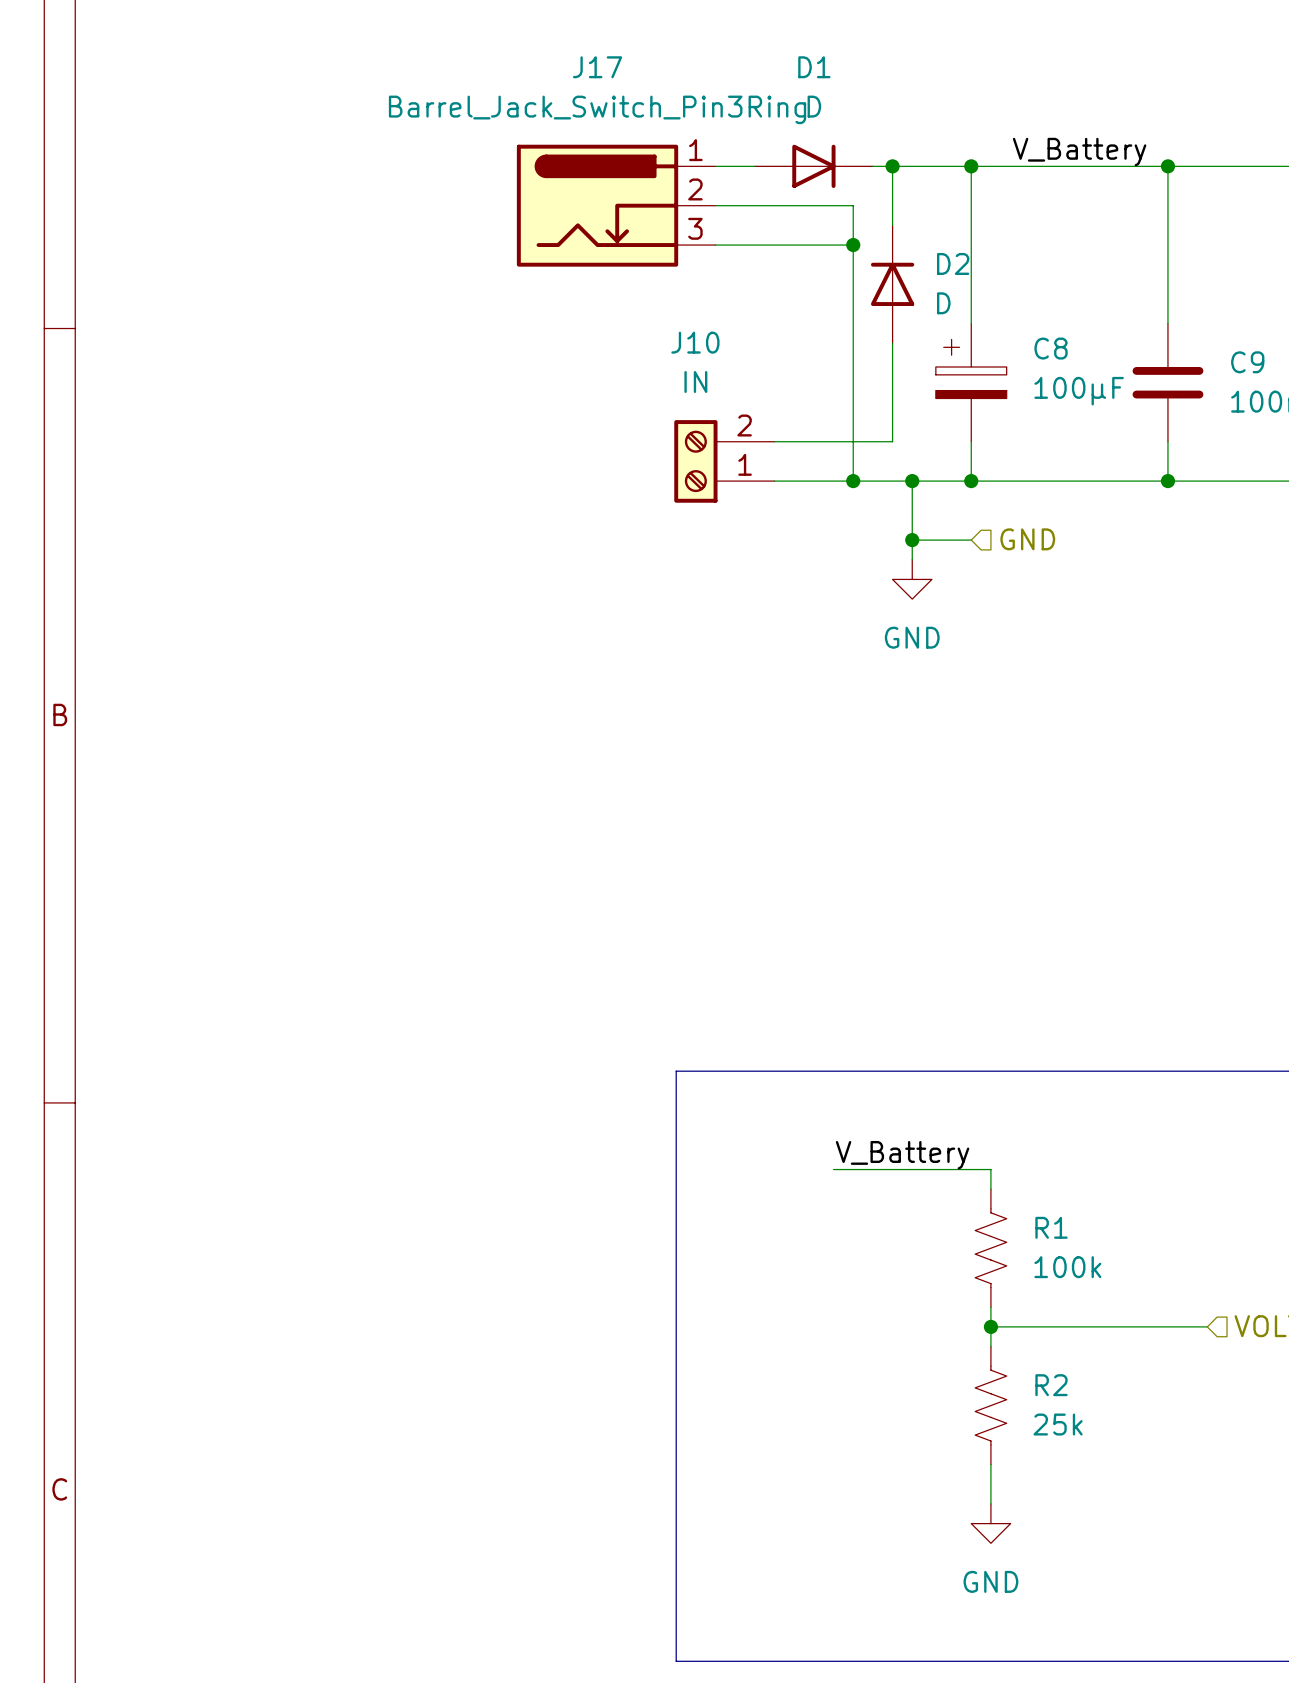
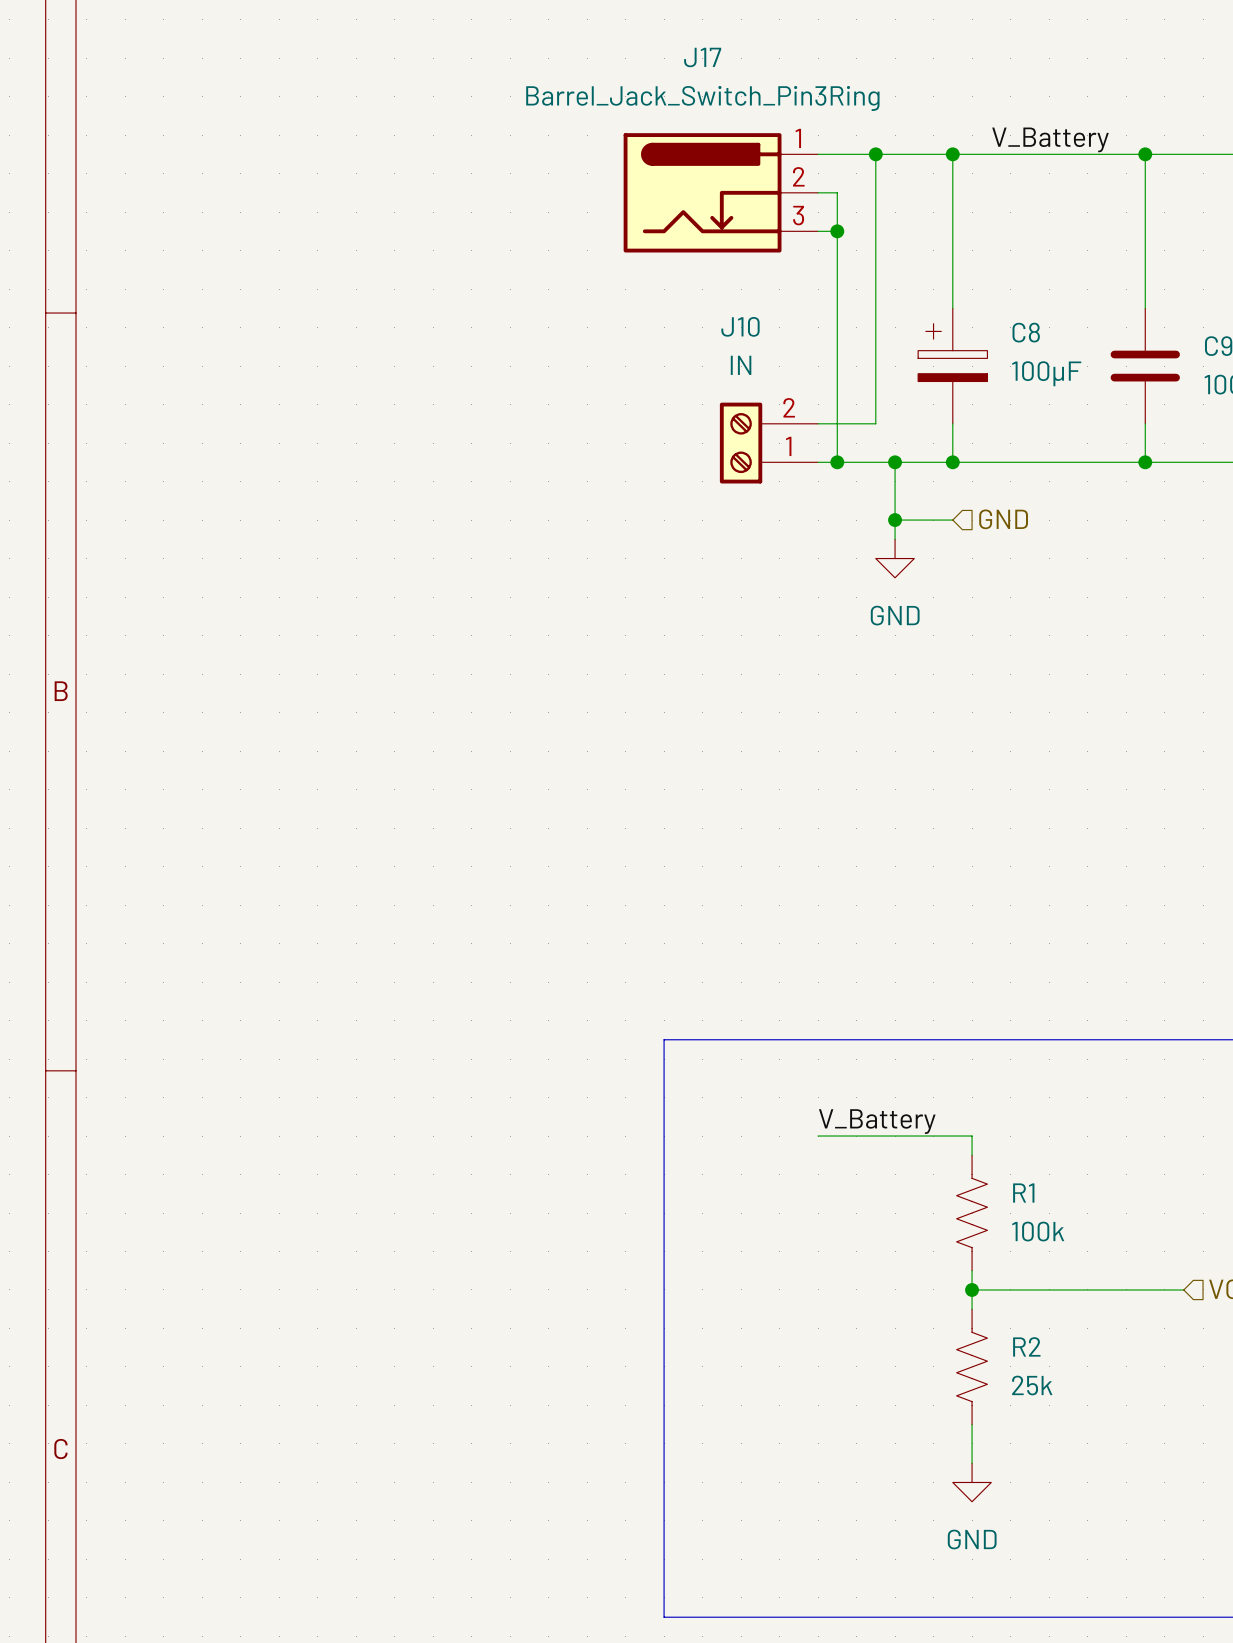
D1: D (813, 166) -> none
J17 position: (616, 205) -> (720, 192)
D2: D (892, 284) -> none
J10 position: (724, 461) -> (768, 443)

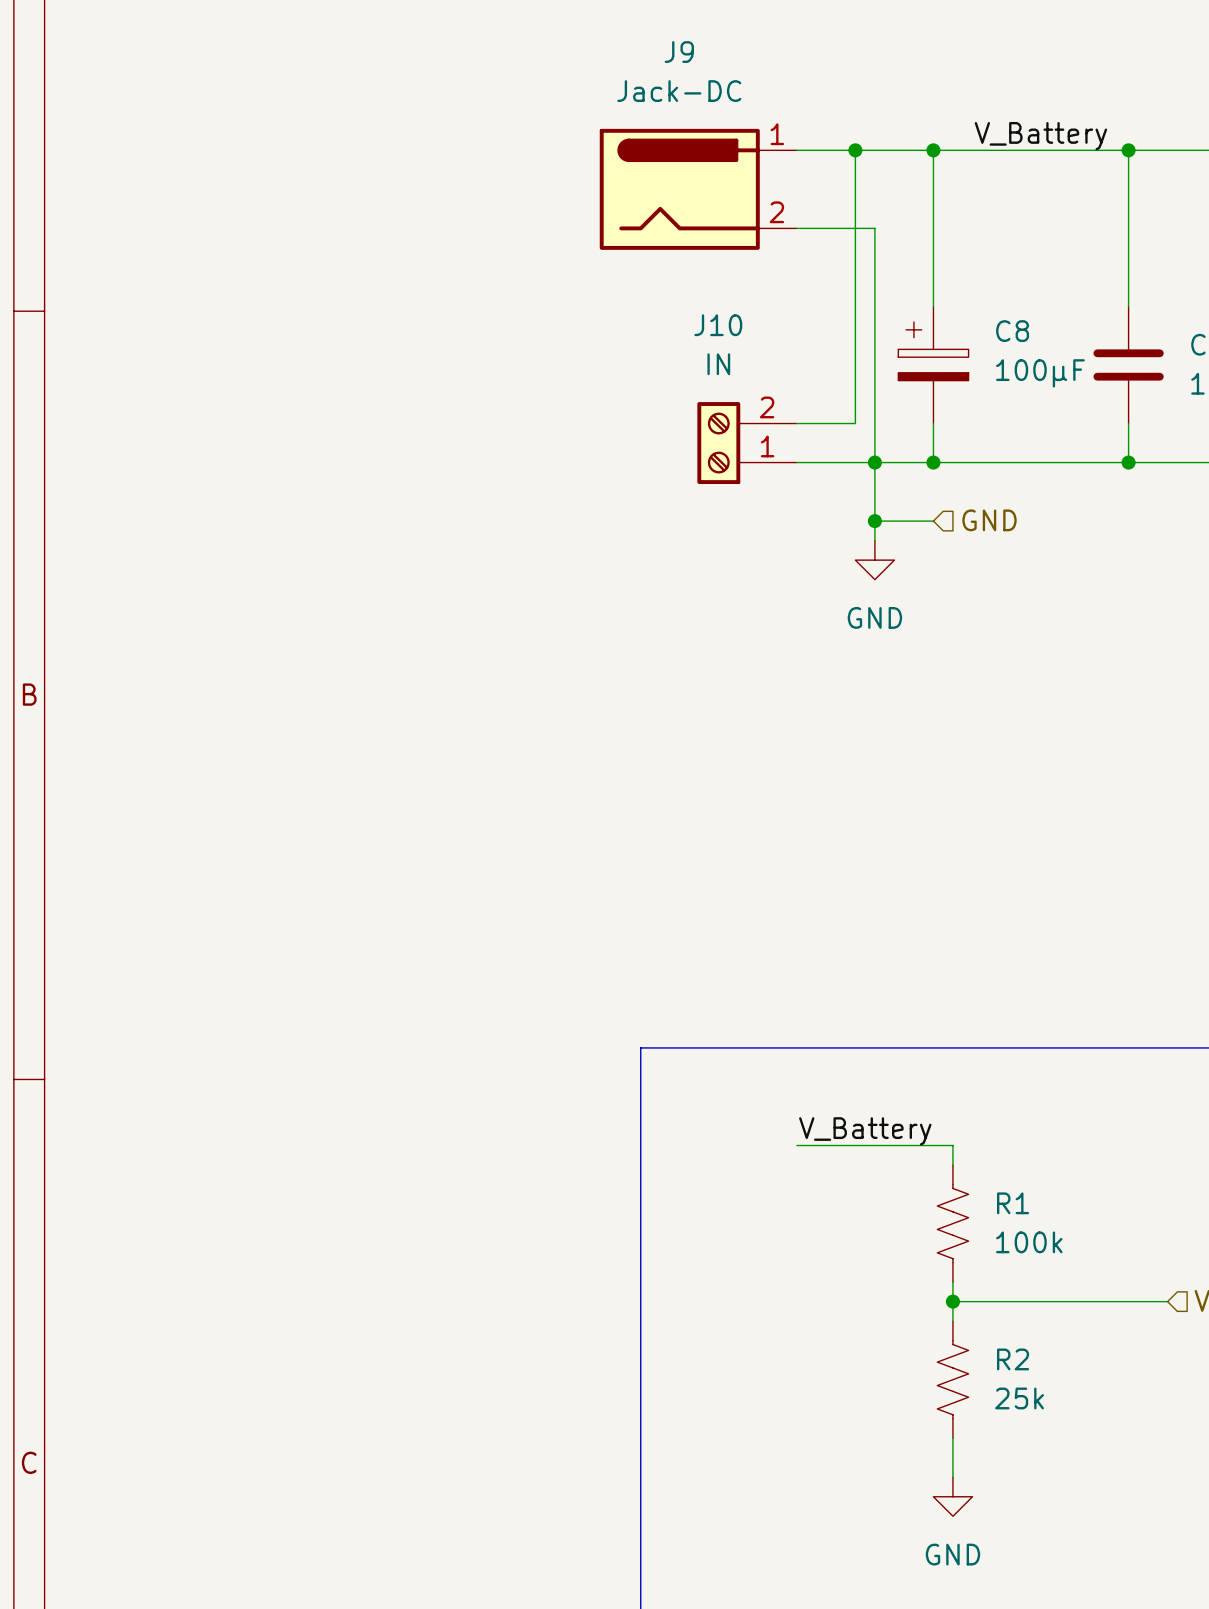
J17: Barrel_Jack_Switch_Pin3Ring (720, 192) -> none
J9: none -> Jack-DC (698, 189)
wire: (818, 192) (837, 192) (837, 462) -> none
wire: none -> (816, 228) (874, 228) (874, 462)
junction: (837, 231) -> none
junction: (837, 462) -> none

